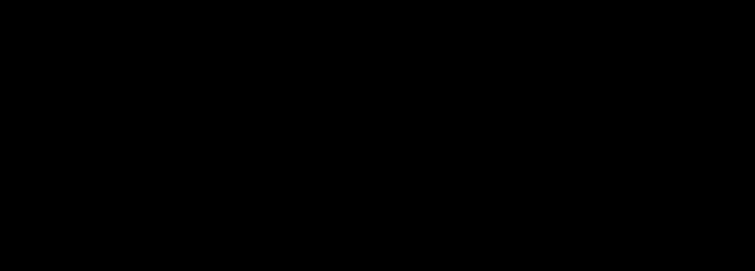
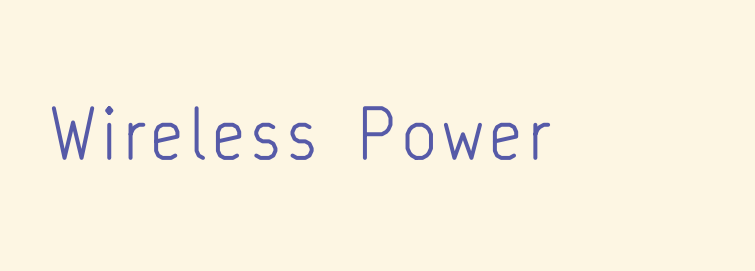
text: none -> Wireless Power (301, 133)

